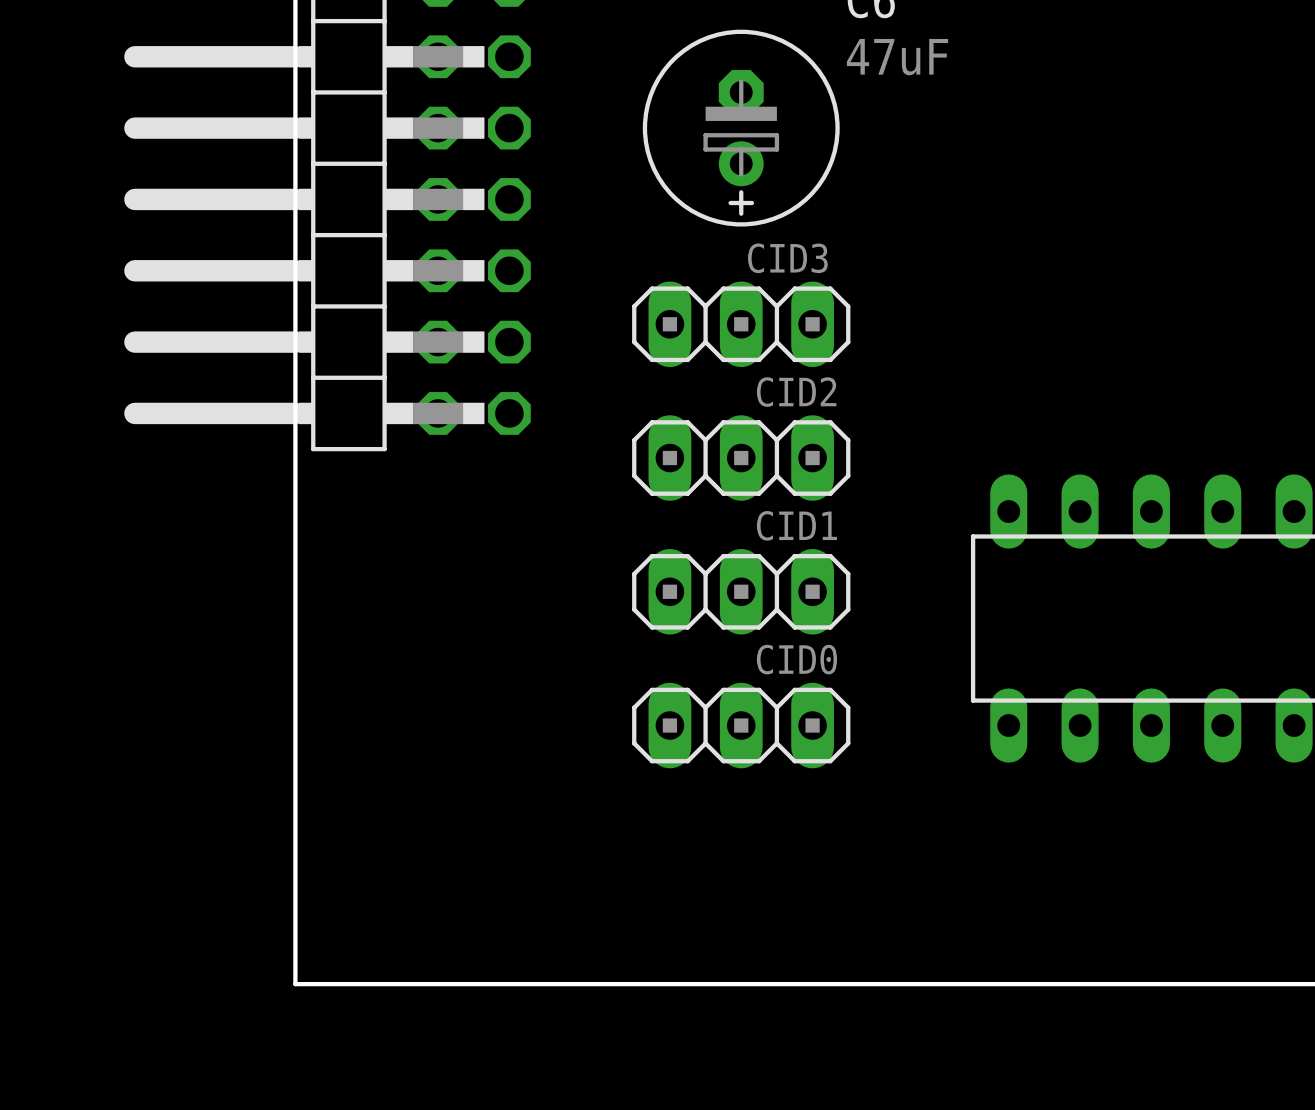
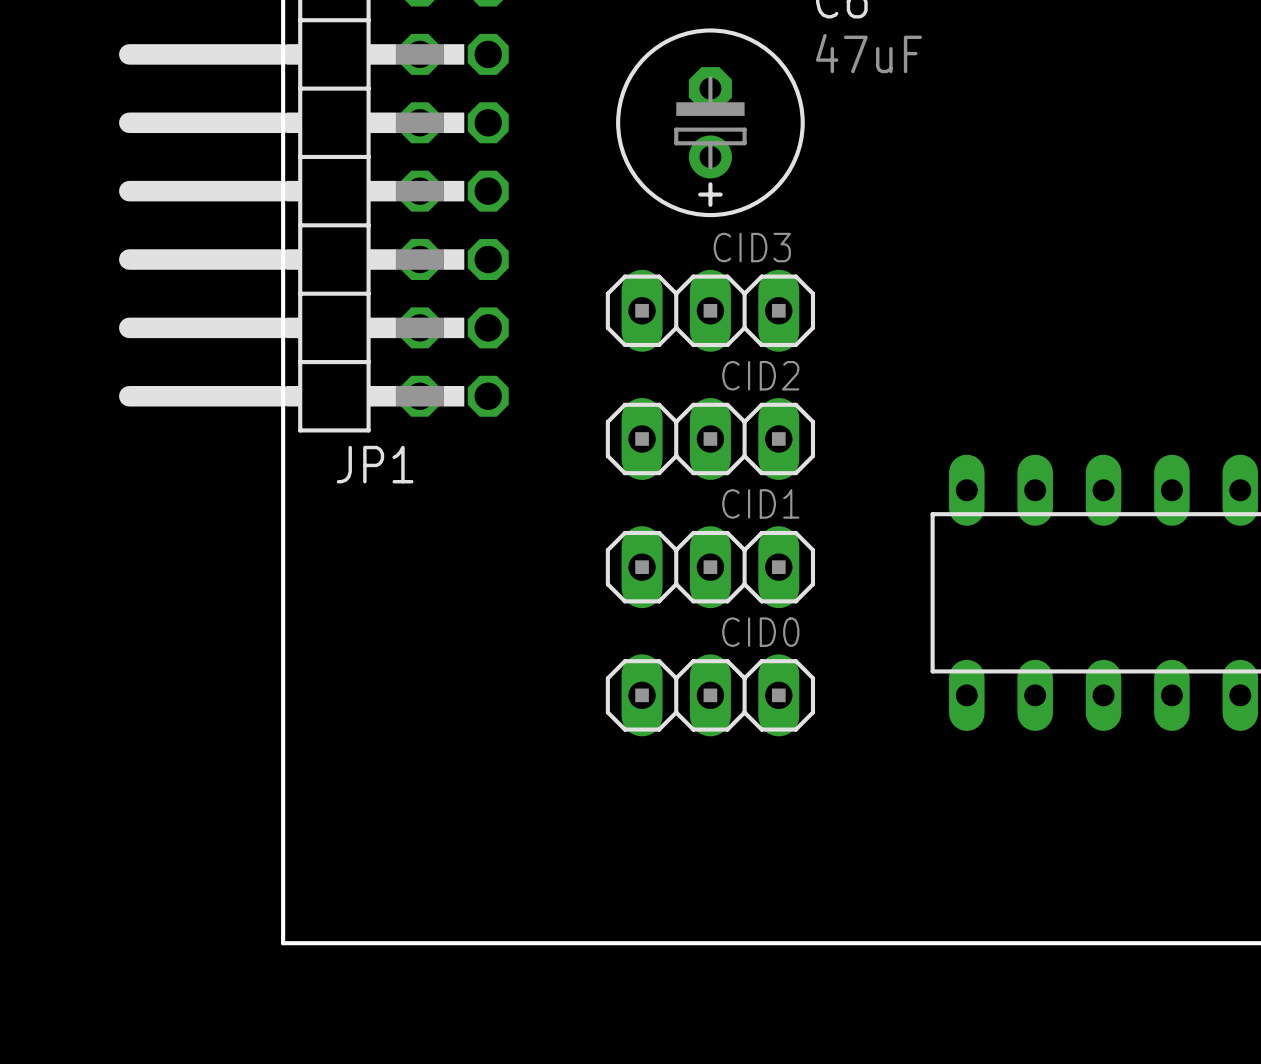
JP1 name: none -> JP1 (375, 464)

